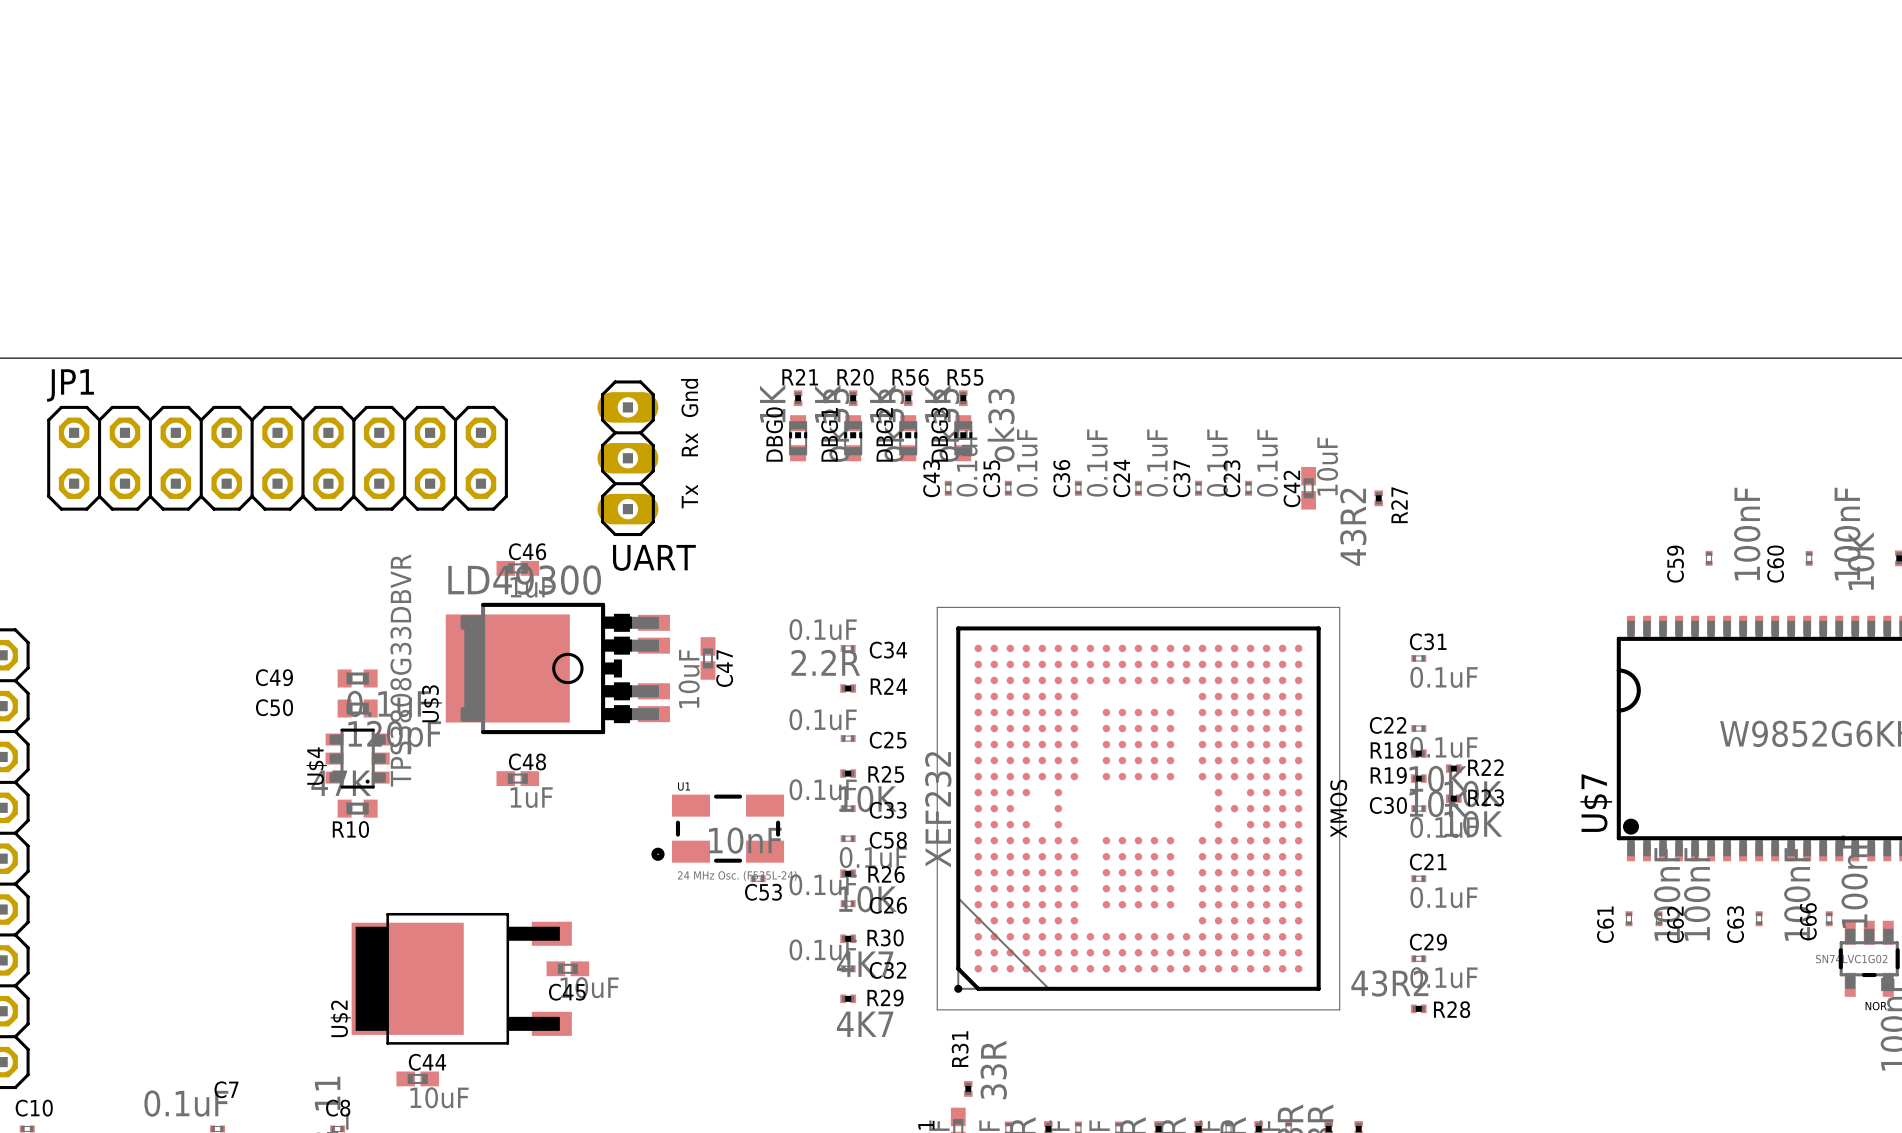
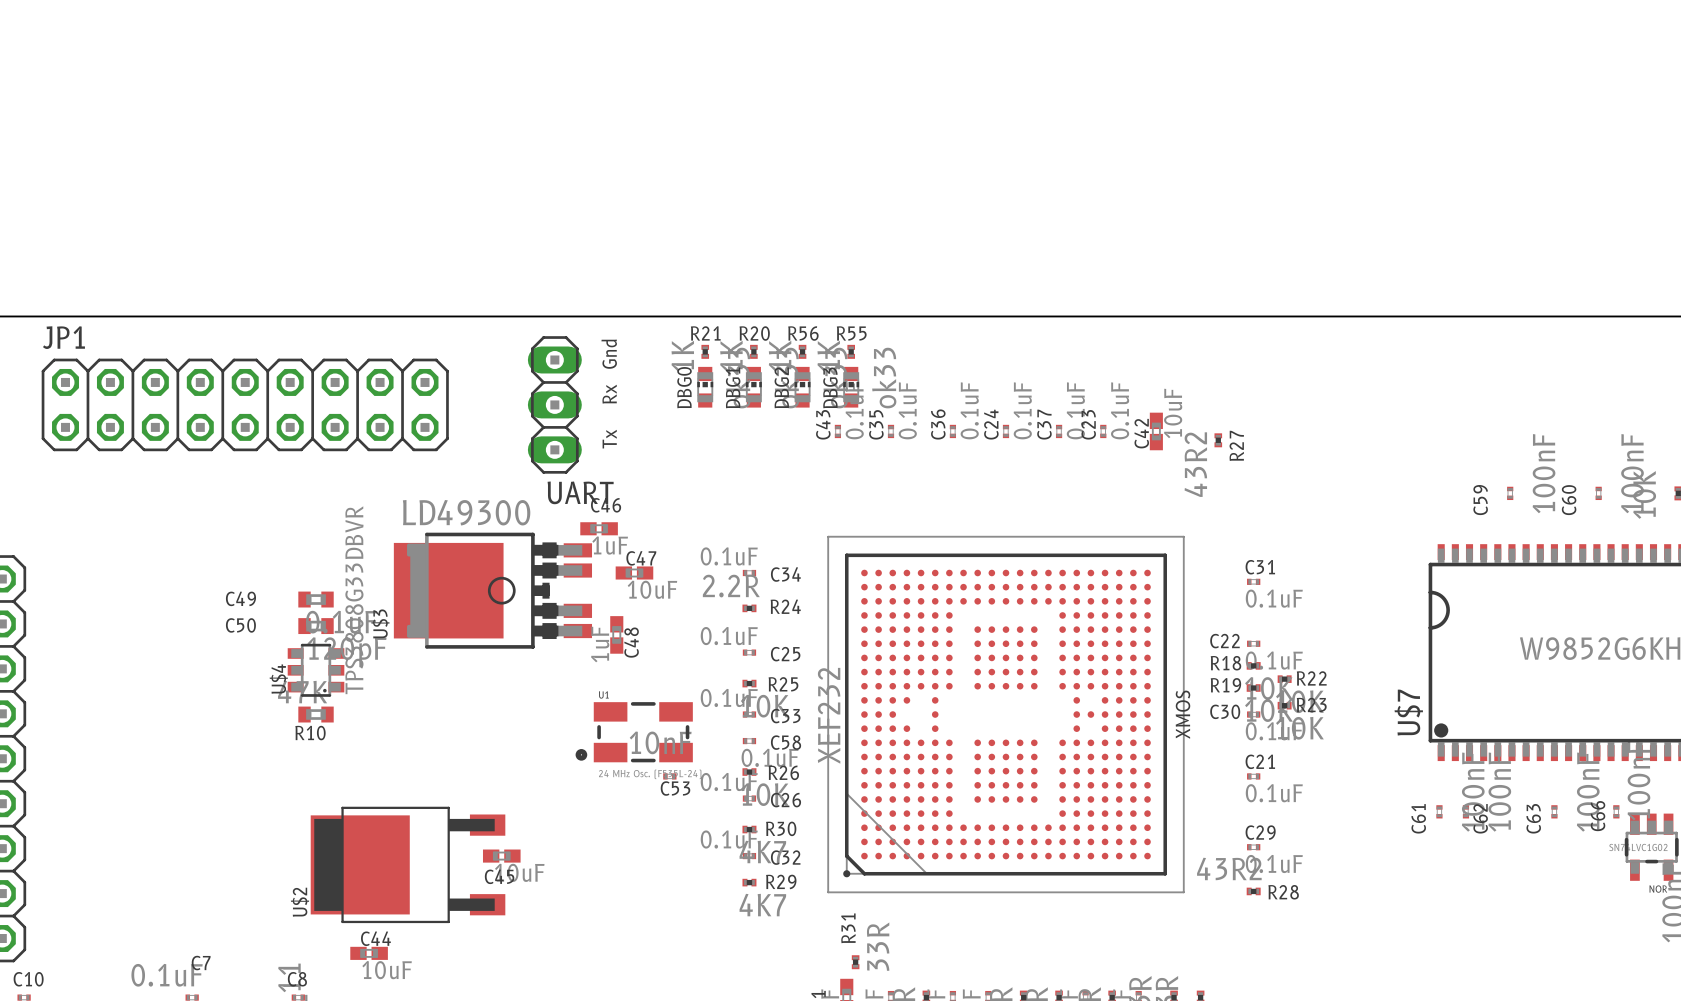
C46 name position: C46 (527, 551) -> C46 (606, 505)
C46 position: (517, 568) -> (599, 528)
C47 rotation: 0° (708, 658) -> 90° clockwise (634, 573)
C47 value position: 10uF (689, 678) -> 10uF (652, 589)
C48 rotation: 0° (517, 778) -> 90° clockwise (616, 634)
C48 position: (517, 778) -> (616, 634)

